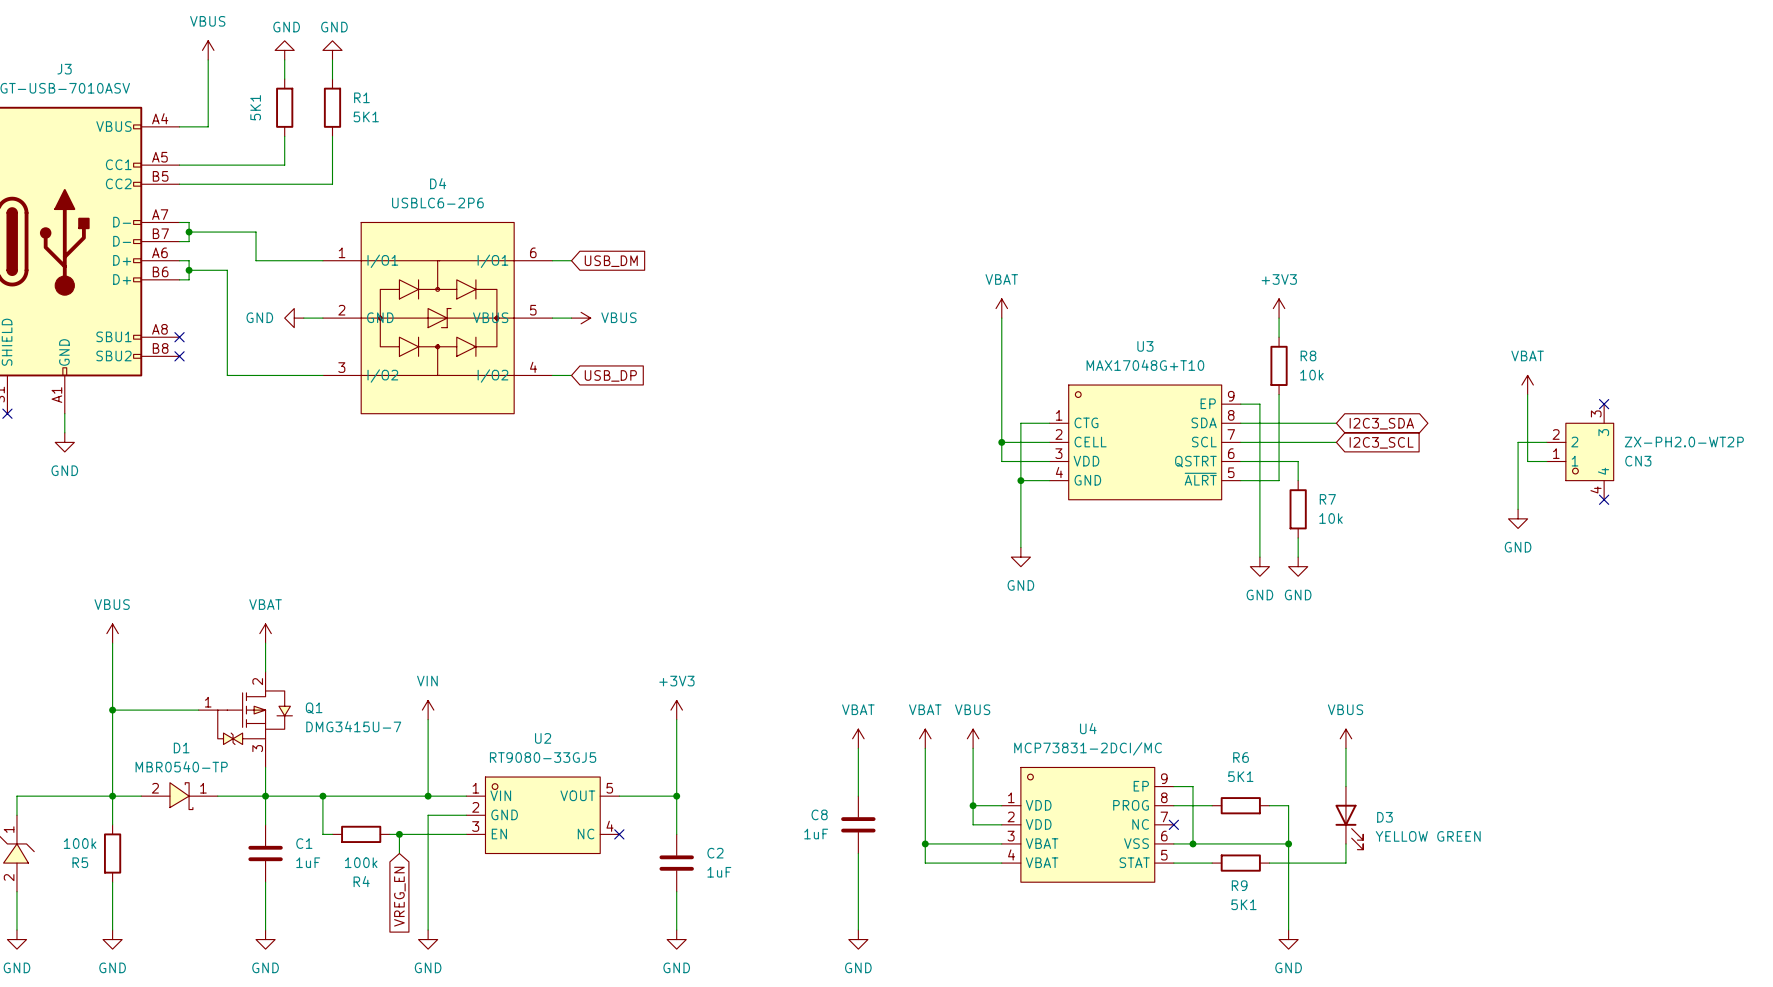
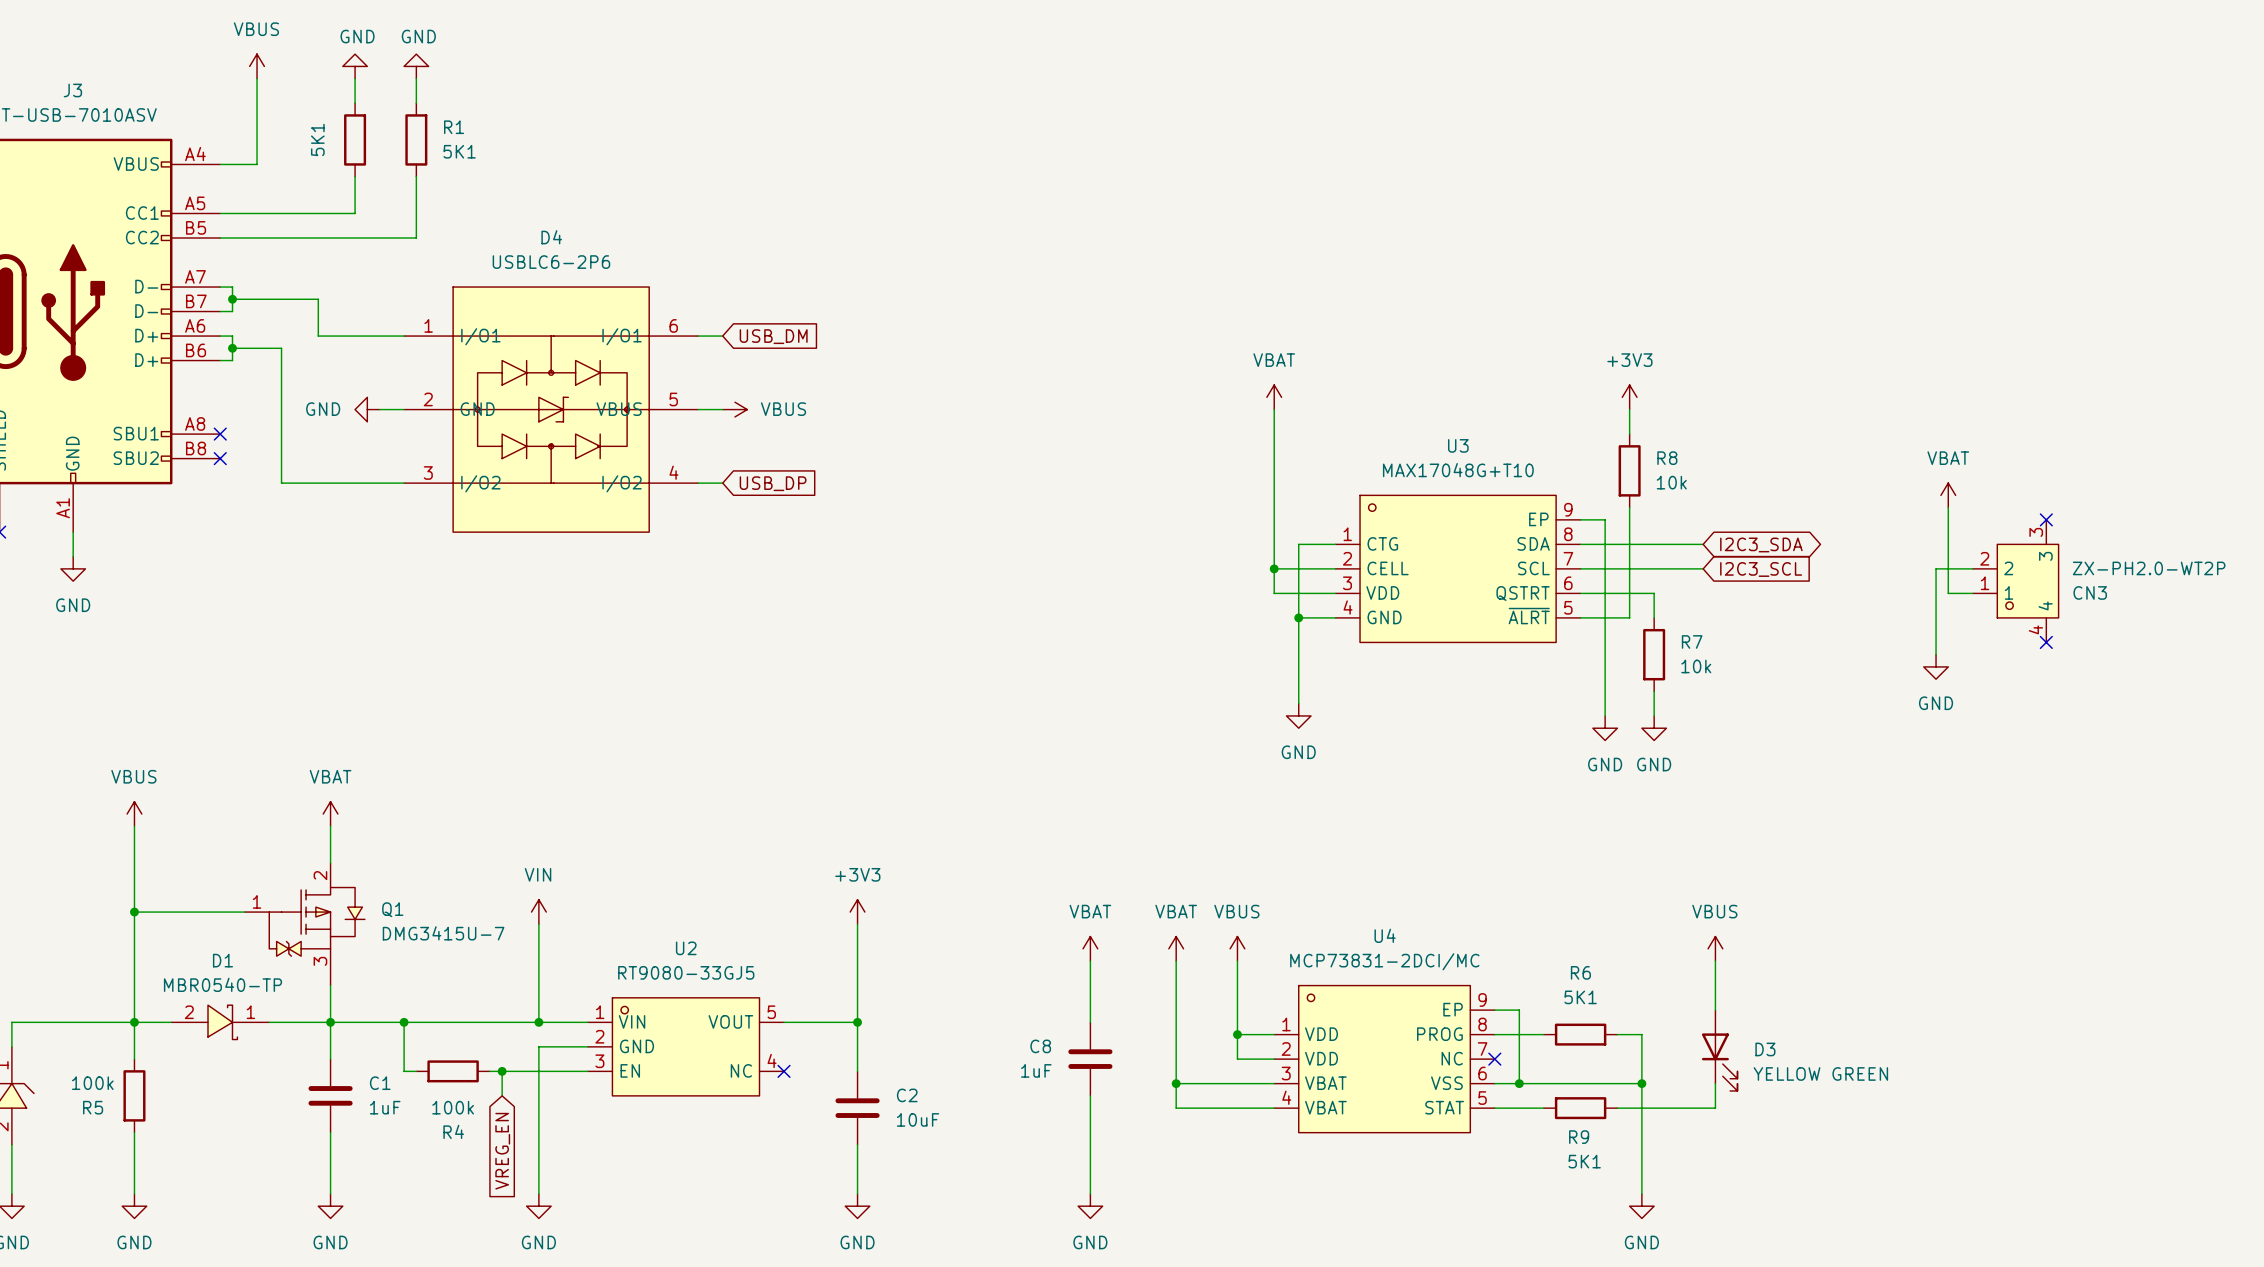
C2 value: 1uF (719, 872) -> 10uF (918, 1119)

